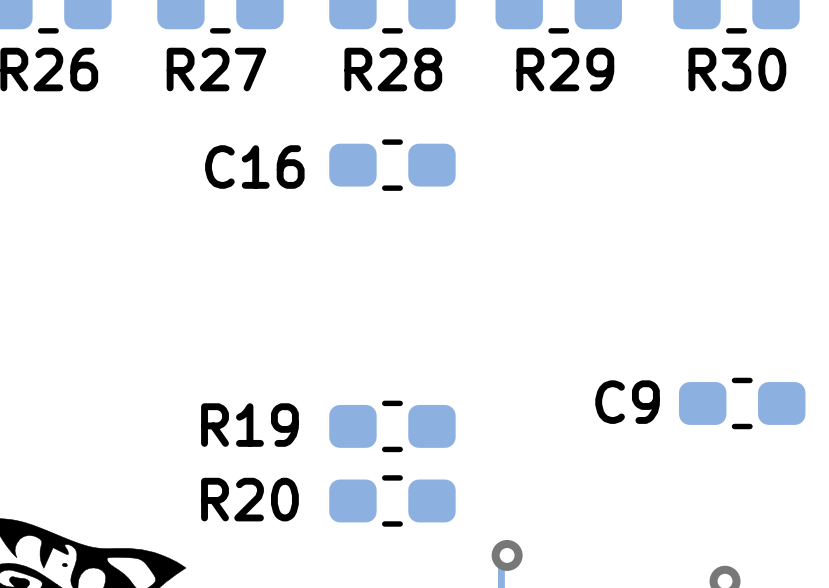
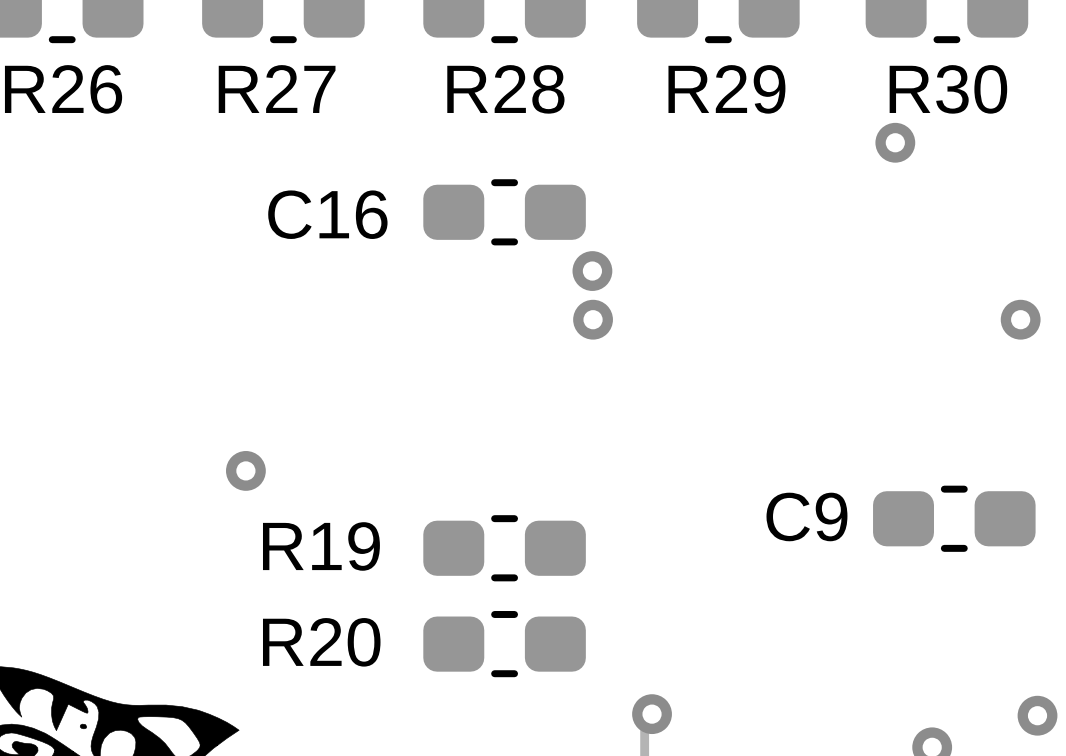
via: none -> (895, 142)
via: none -> (592, 271)
via: none -> (593, 319)
via: none -> (1020, 319)
via: none -> (245, 470)
via: none -> (1037, 715)

